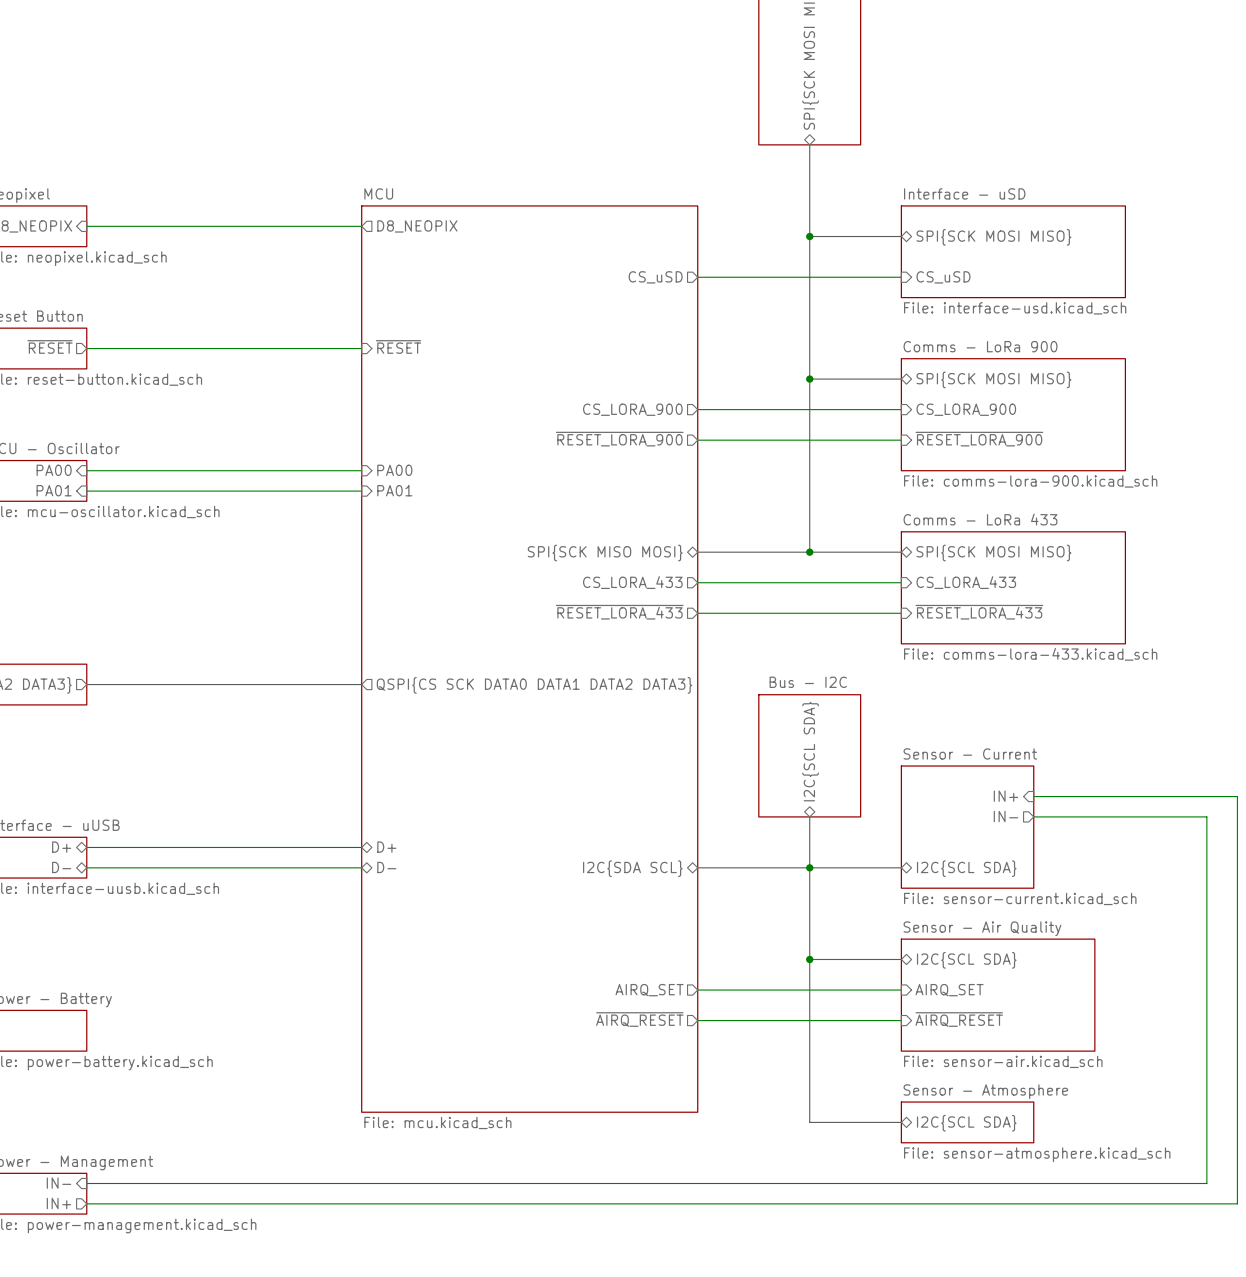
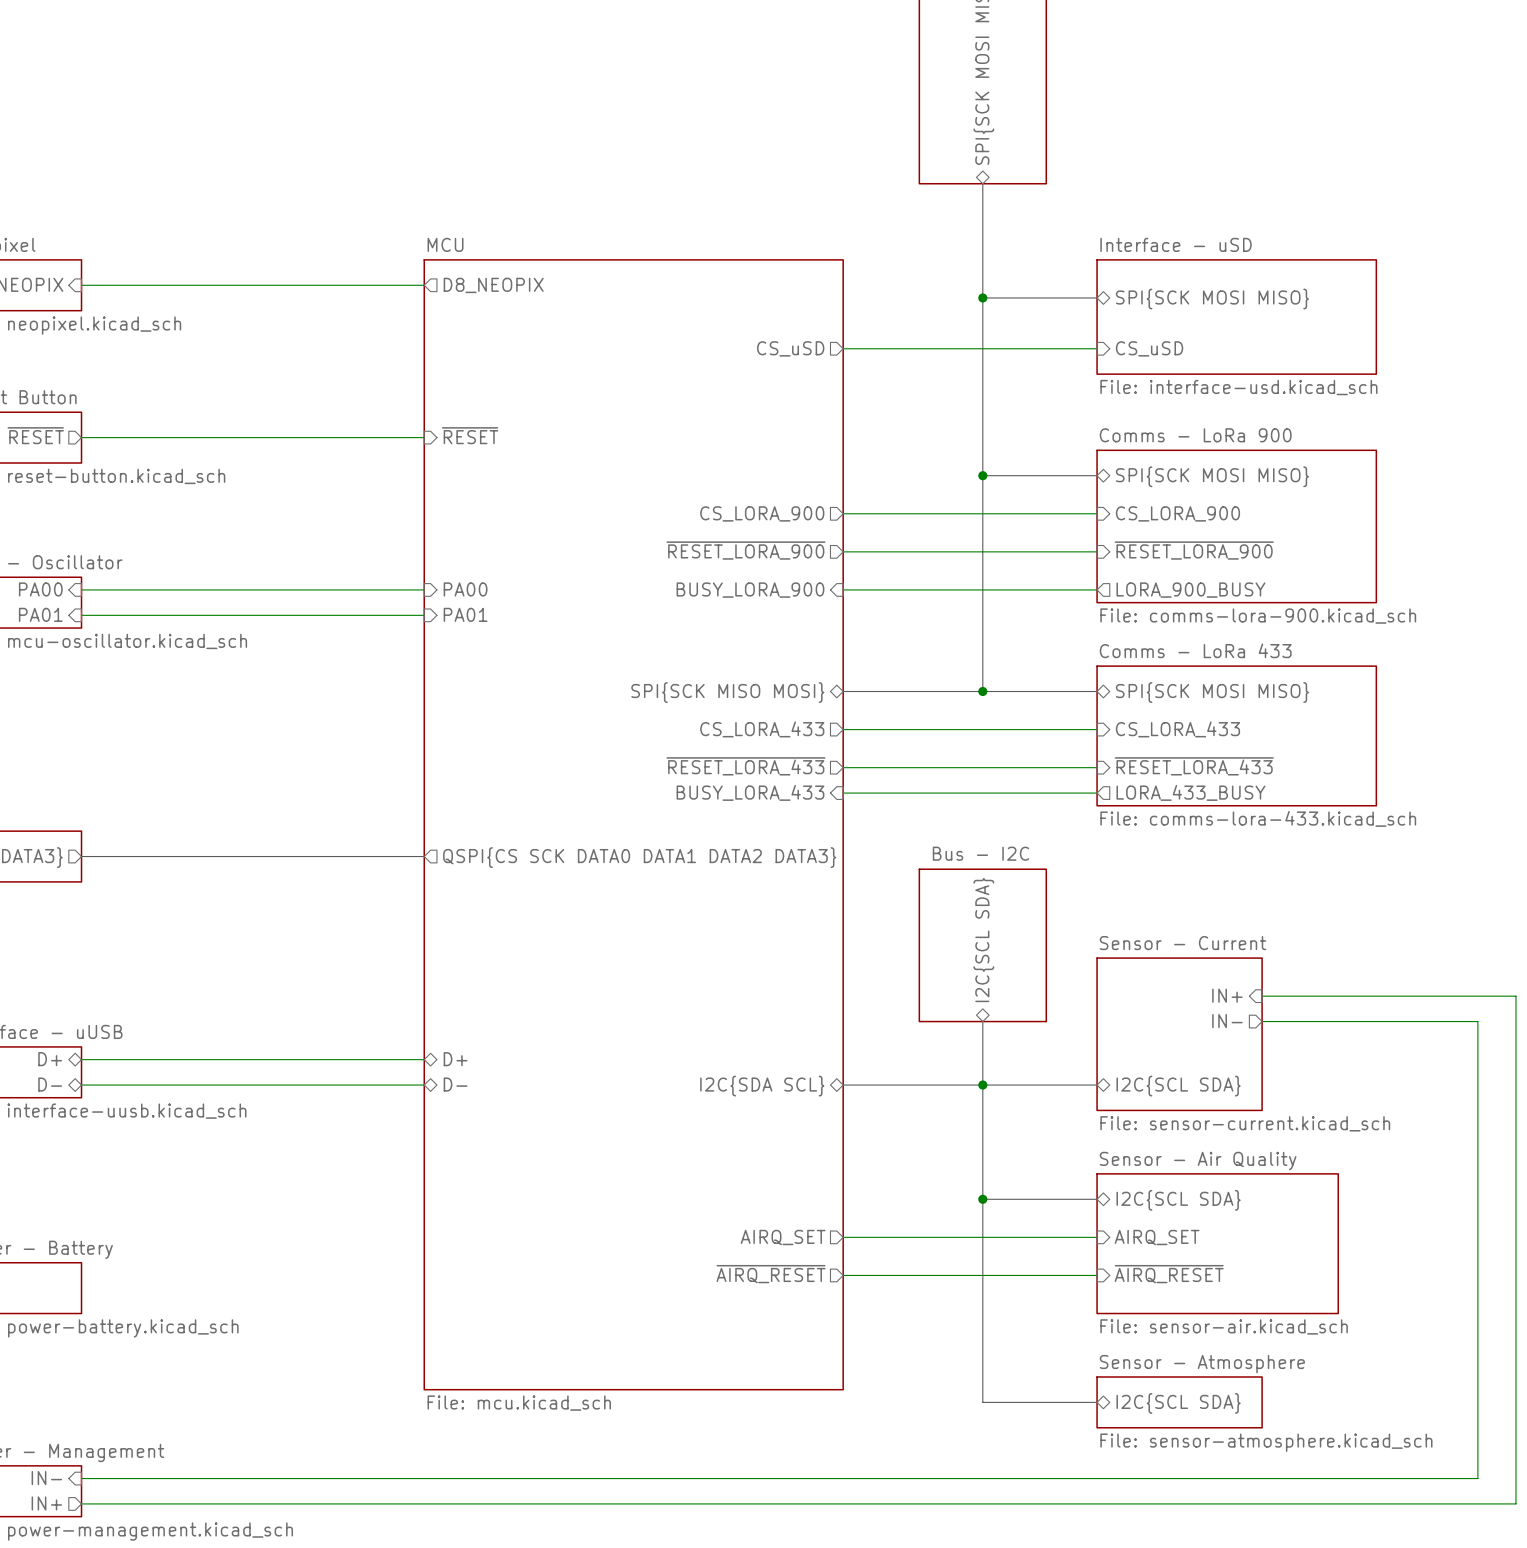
sheet Comms - LoRa 900 shape: [900, 358, 1127, 472] -> [1096, 449, 1378, 604]
sheet pin: none -> BUSY_LORA_900 (750, 590)
wire: none -> (843, 589) (1097, 589)
sheet pin: none -> LORA_900_BUSY (1190, 590)
sheet pin: none -> BUSY_LORA_433 (750, 792)
wire: none -> (843, 793) (1097, 793)
sheet pin: none -> LORA_433_BUSY (1190, 792)

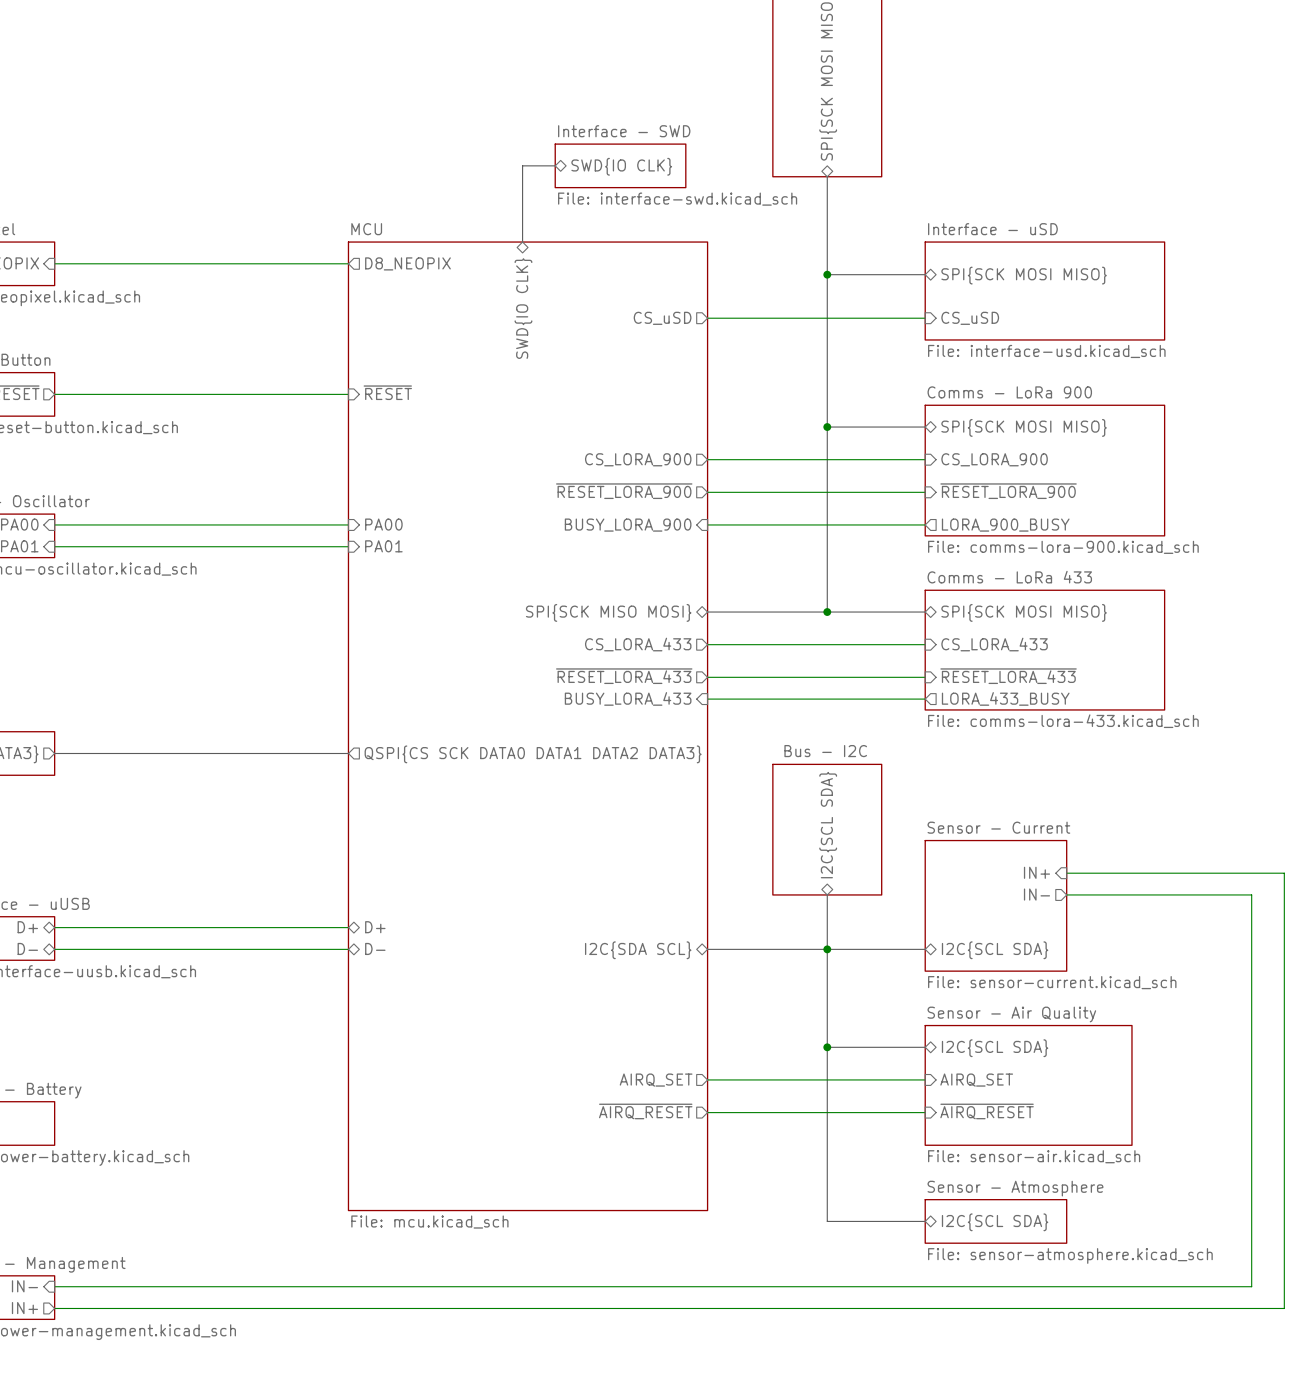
bus: none -> (555, 165) (522, 165) (522, 242)
sheet Interface - SWD: none -> File: interface-swd.kicad_sch (620, 165)
sheet pin: none -> SWD{IO CLK} (621, 166)
sheet pin: none -> SWD{IO CLK} (523, 308)

